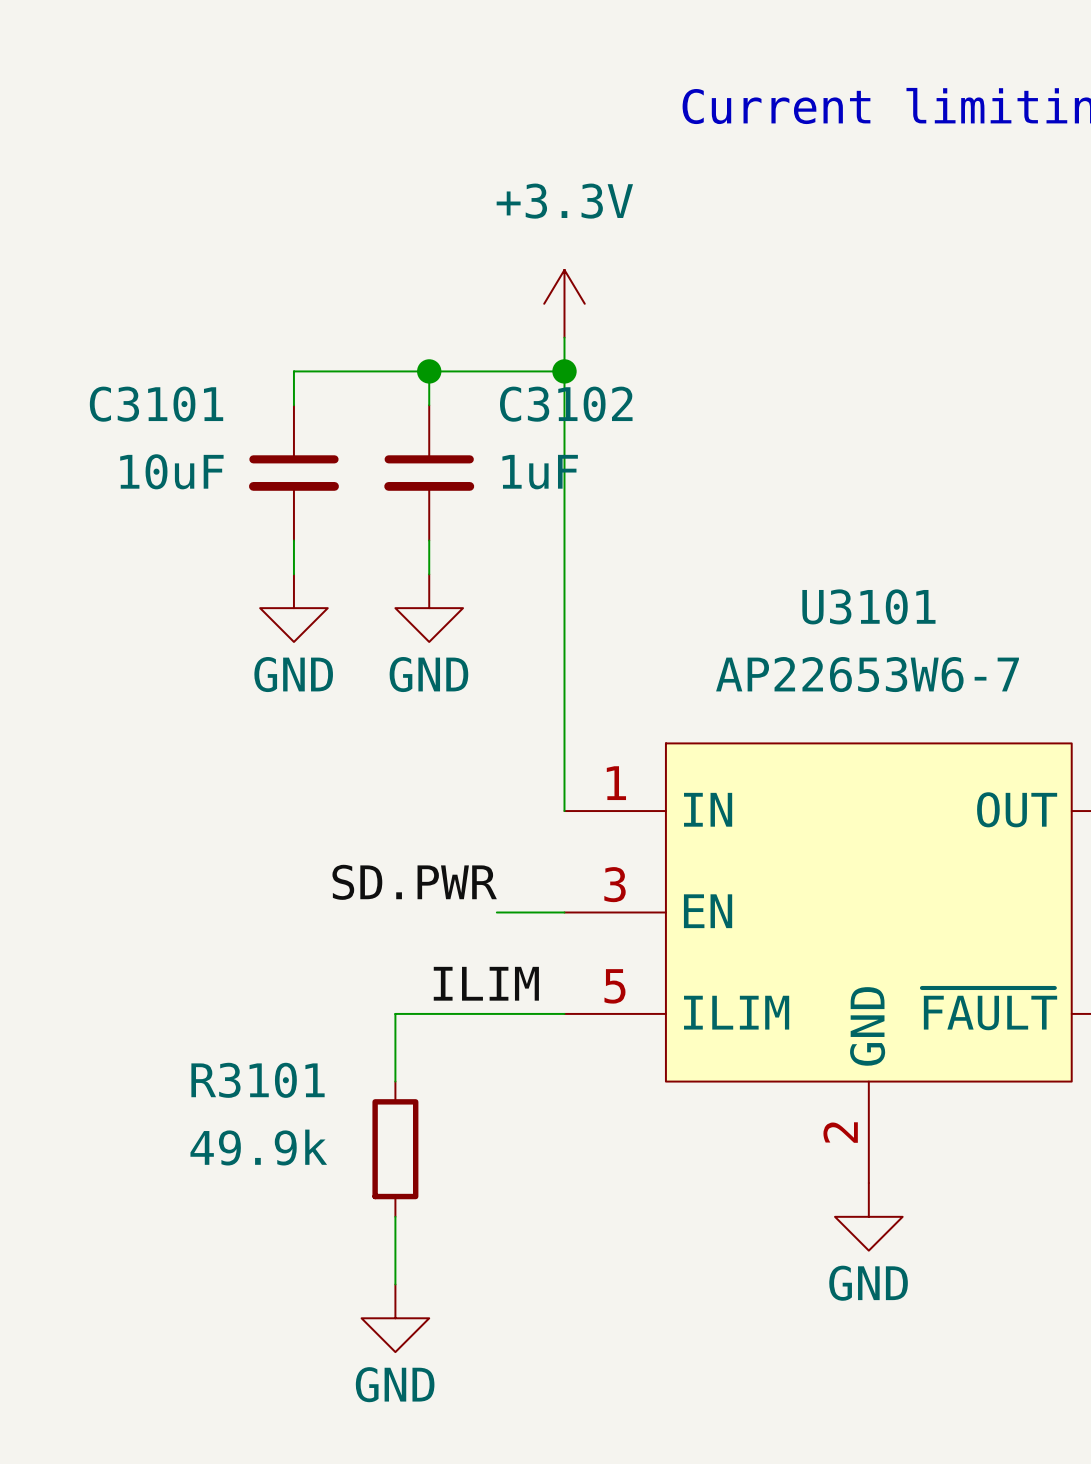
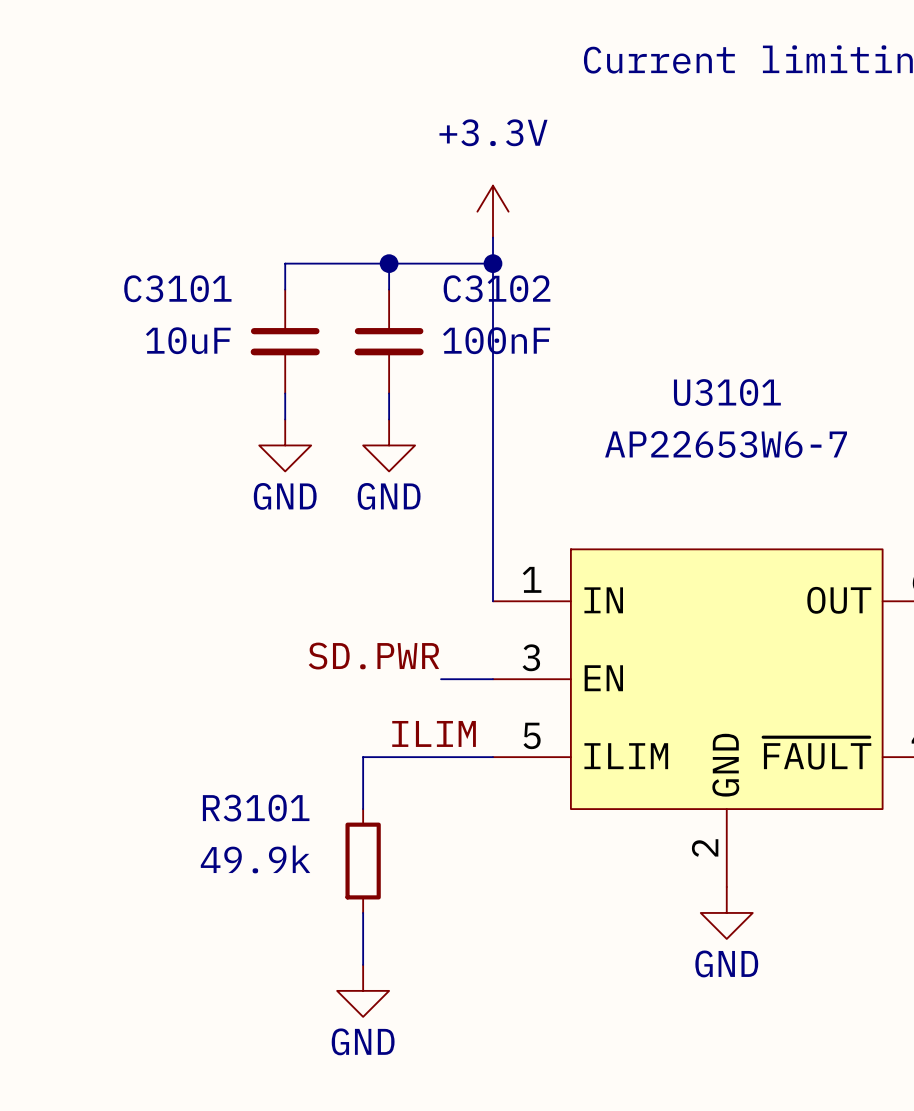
C3102 value: 1uF (540, 472) -> 100nF (496, 340)
U3101 name position: U3101 (868, 606) -> U3101 (727, 392)
U3101 value position: AP22653W6-7 (867, 674) -> AP22653W6-7 (726, 444)

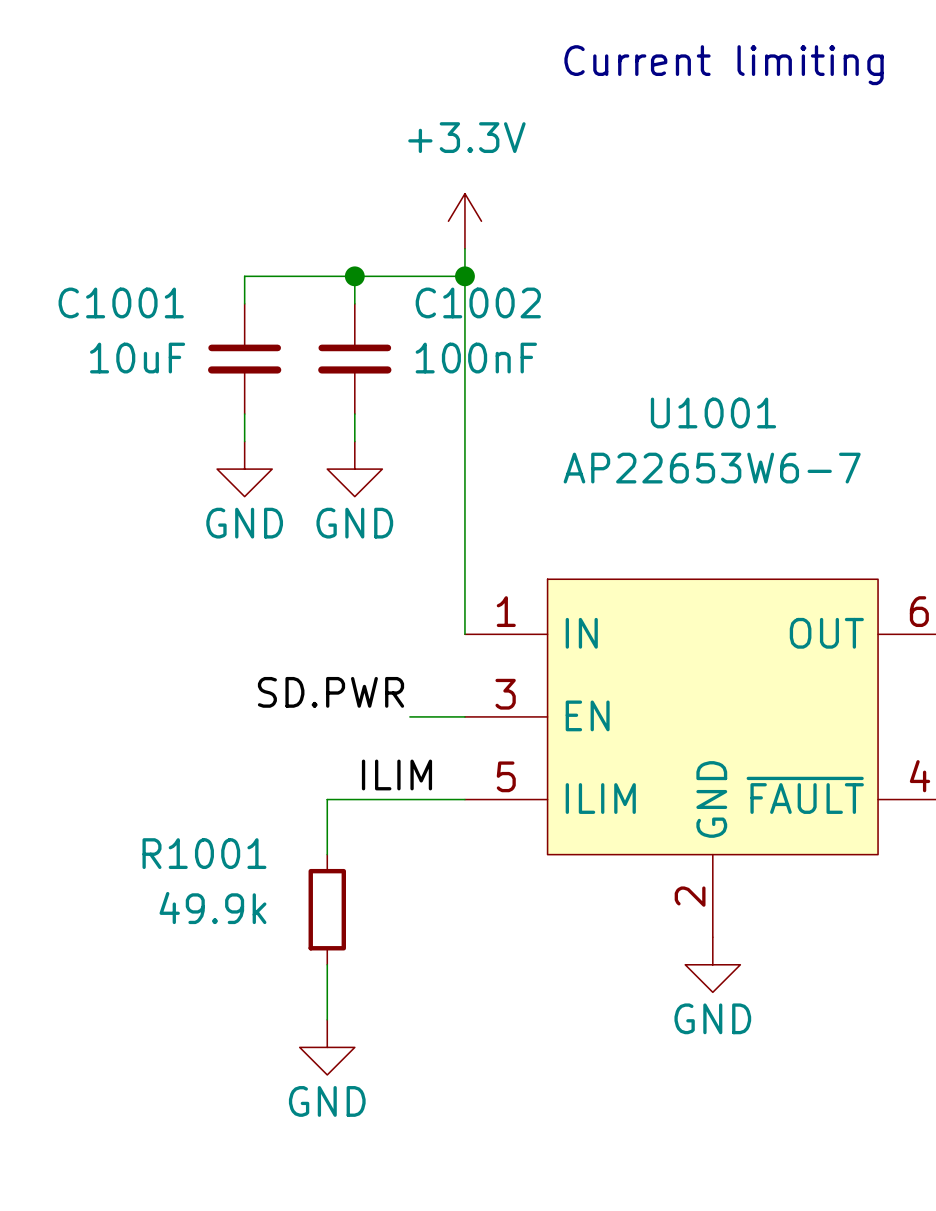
C3101 name: C3101 (177, 288) -> C1001 (121, 302)
C3102 name: C3102 (497, 288) -> C1002 (478, 302)
U3101 name: U3101 (727, 392) -> U1001 (713, 412)
R3101 name: R3101 (256, 808) -> R1001 (204, 853)

